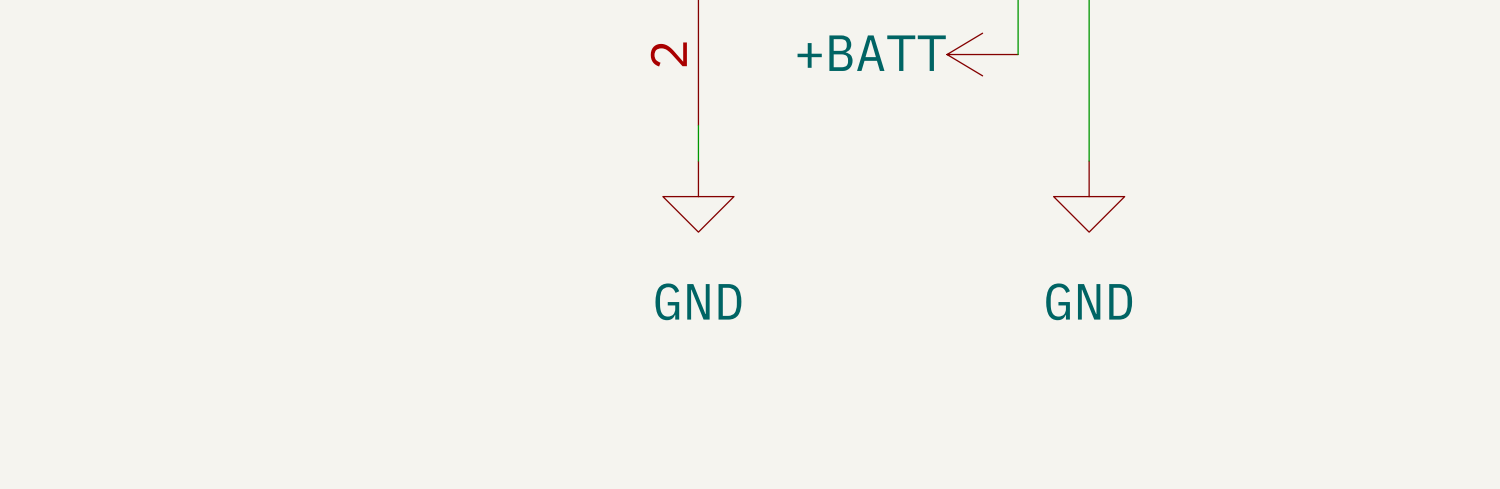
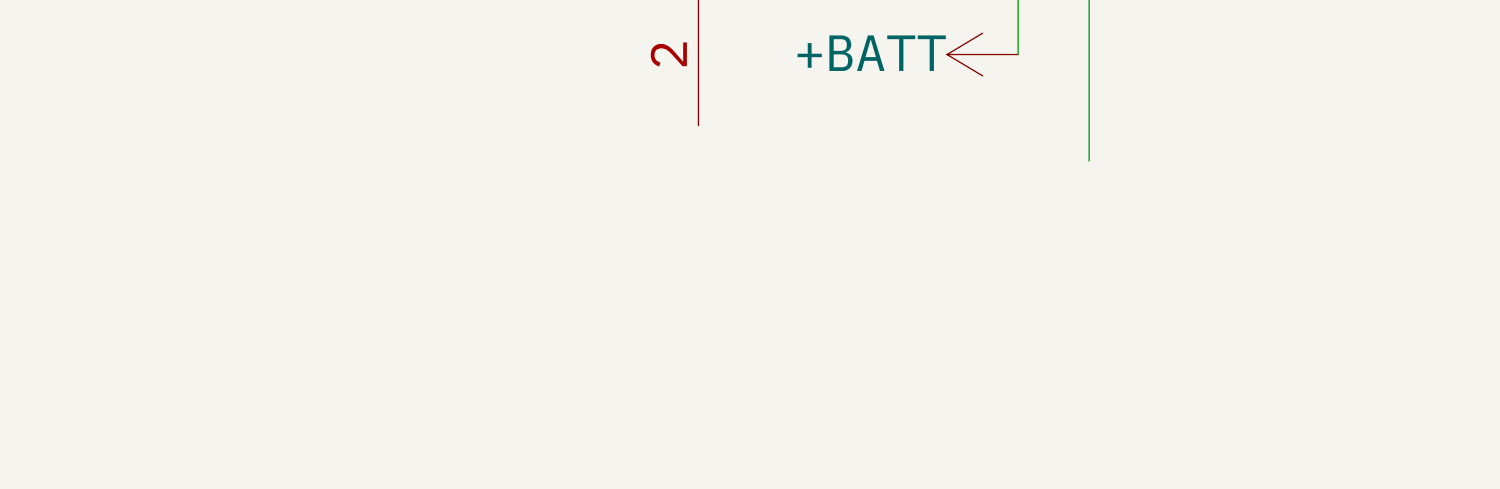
wire: (698, 125) (698, 161) -> none
power symbol: GND (698, 196) -> none
power symbol: GND (1089, 196) -> none

